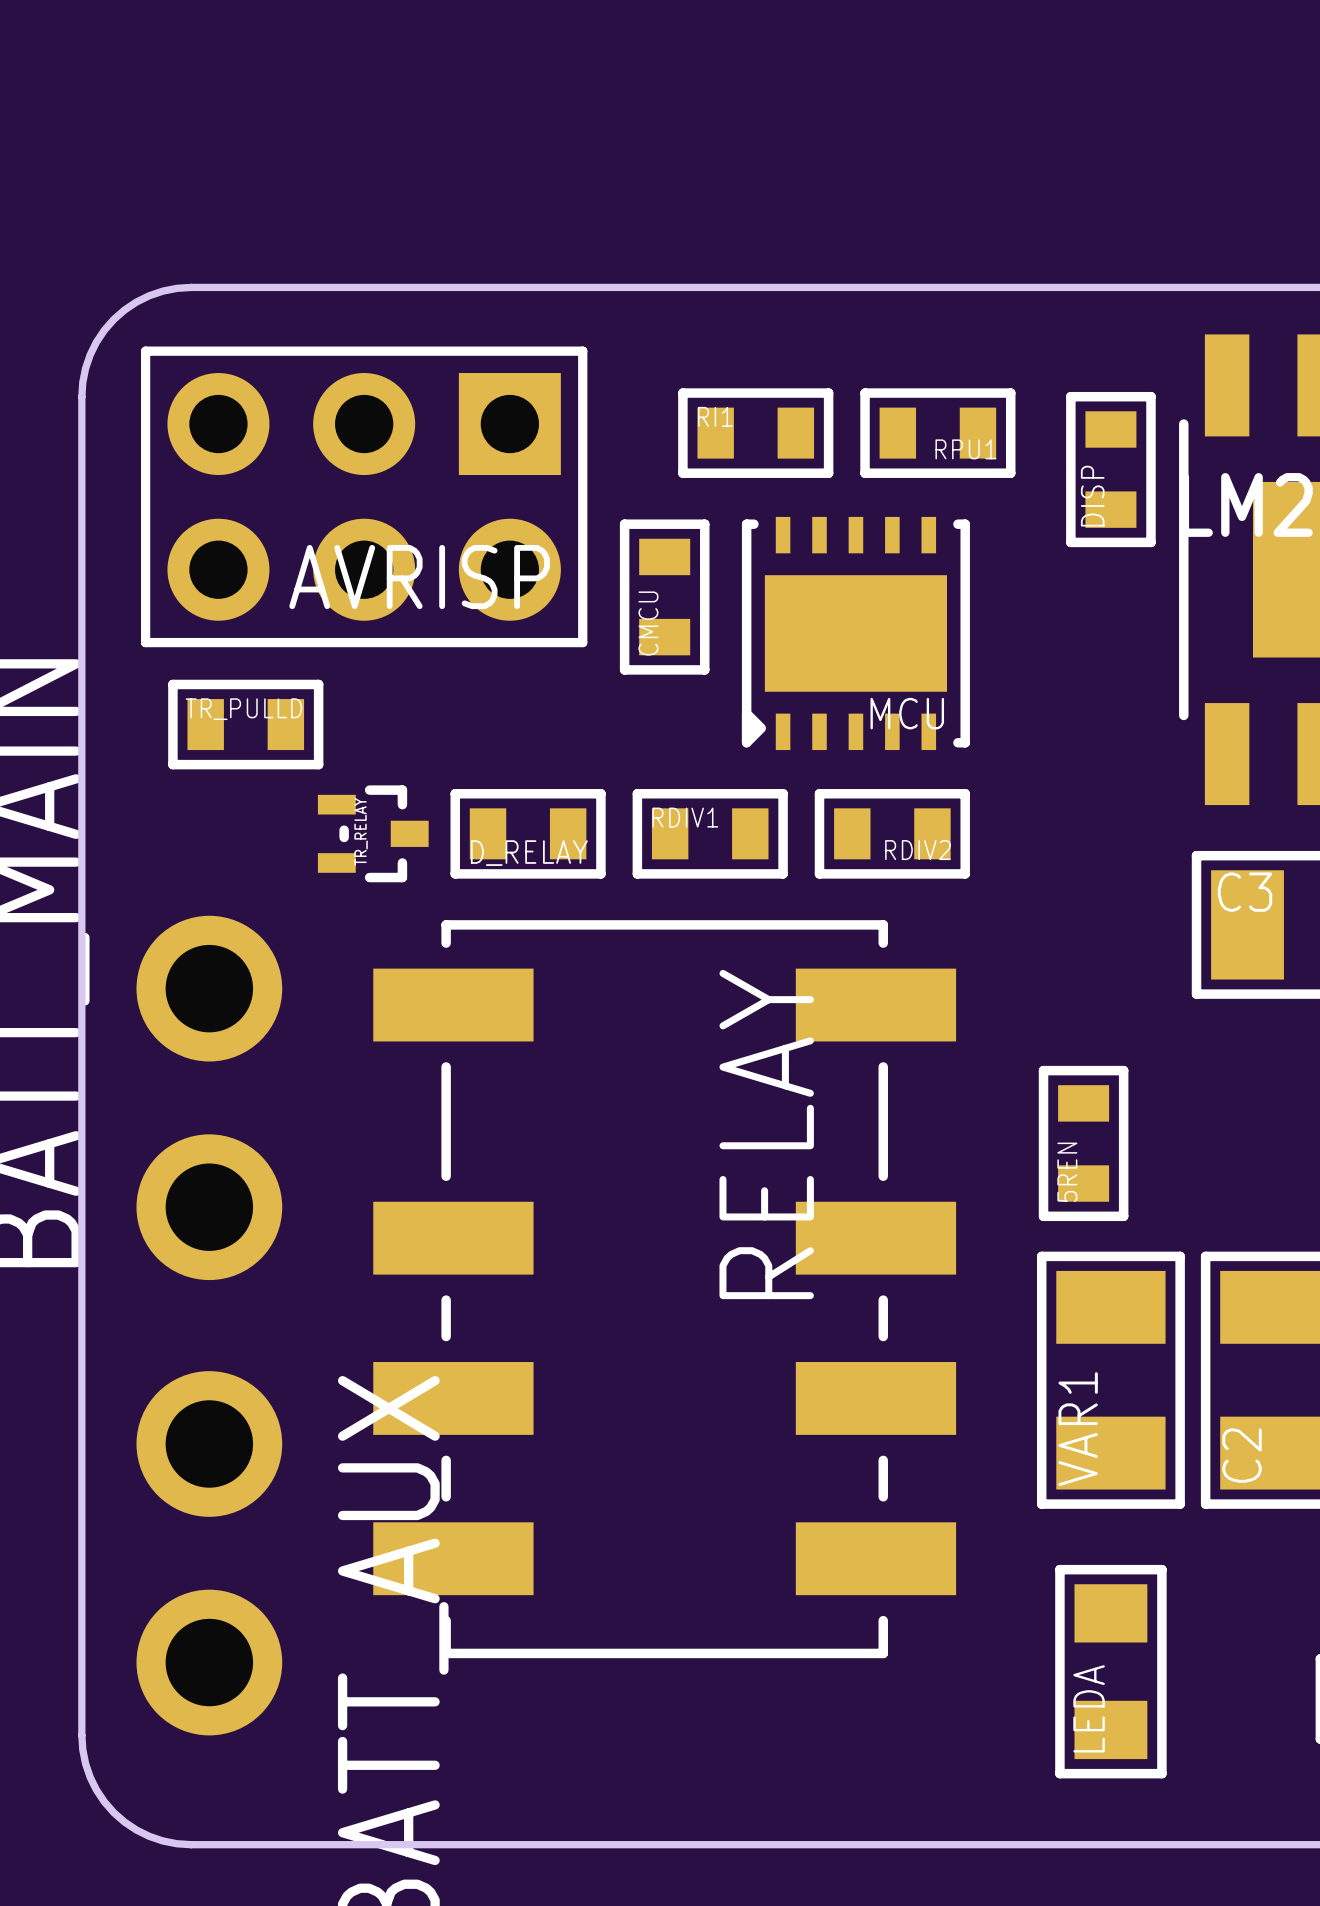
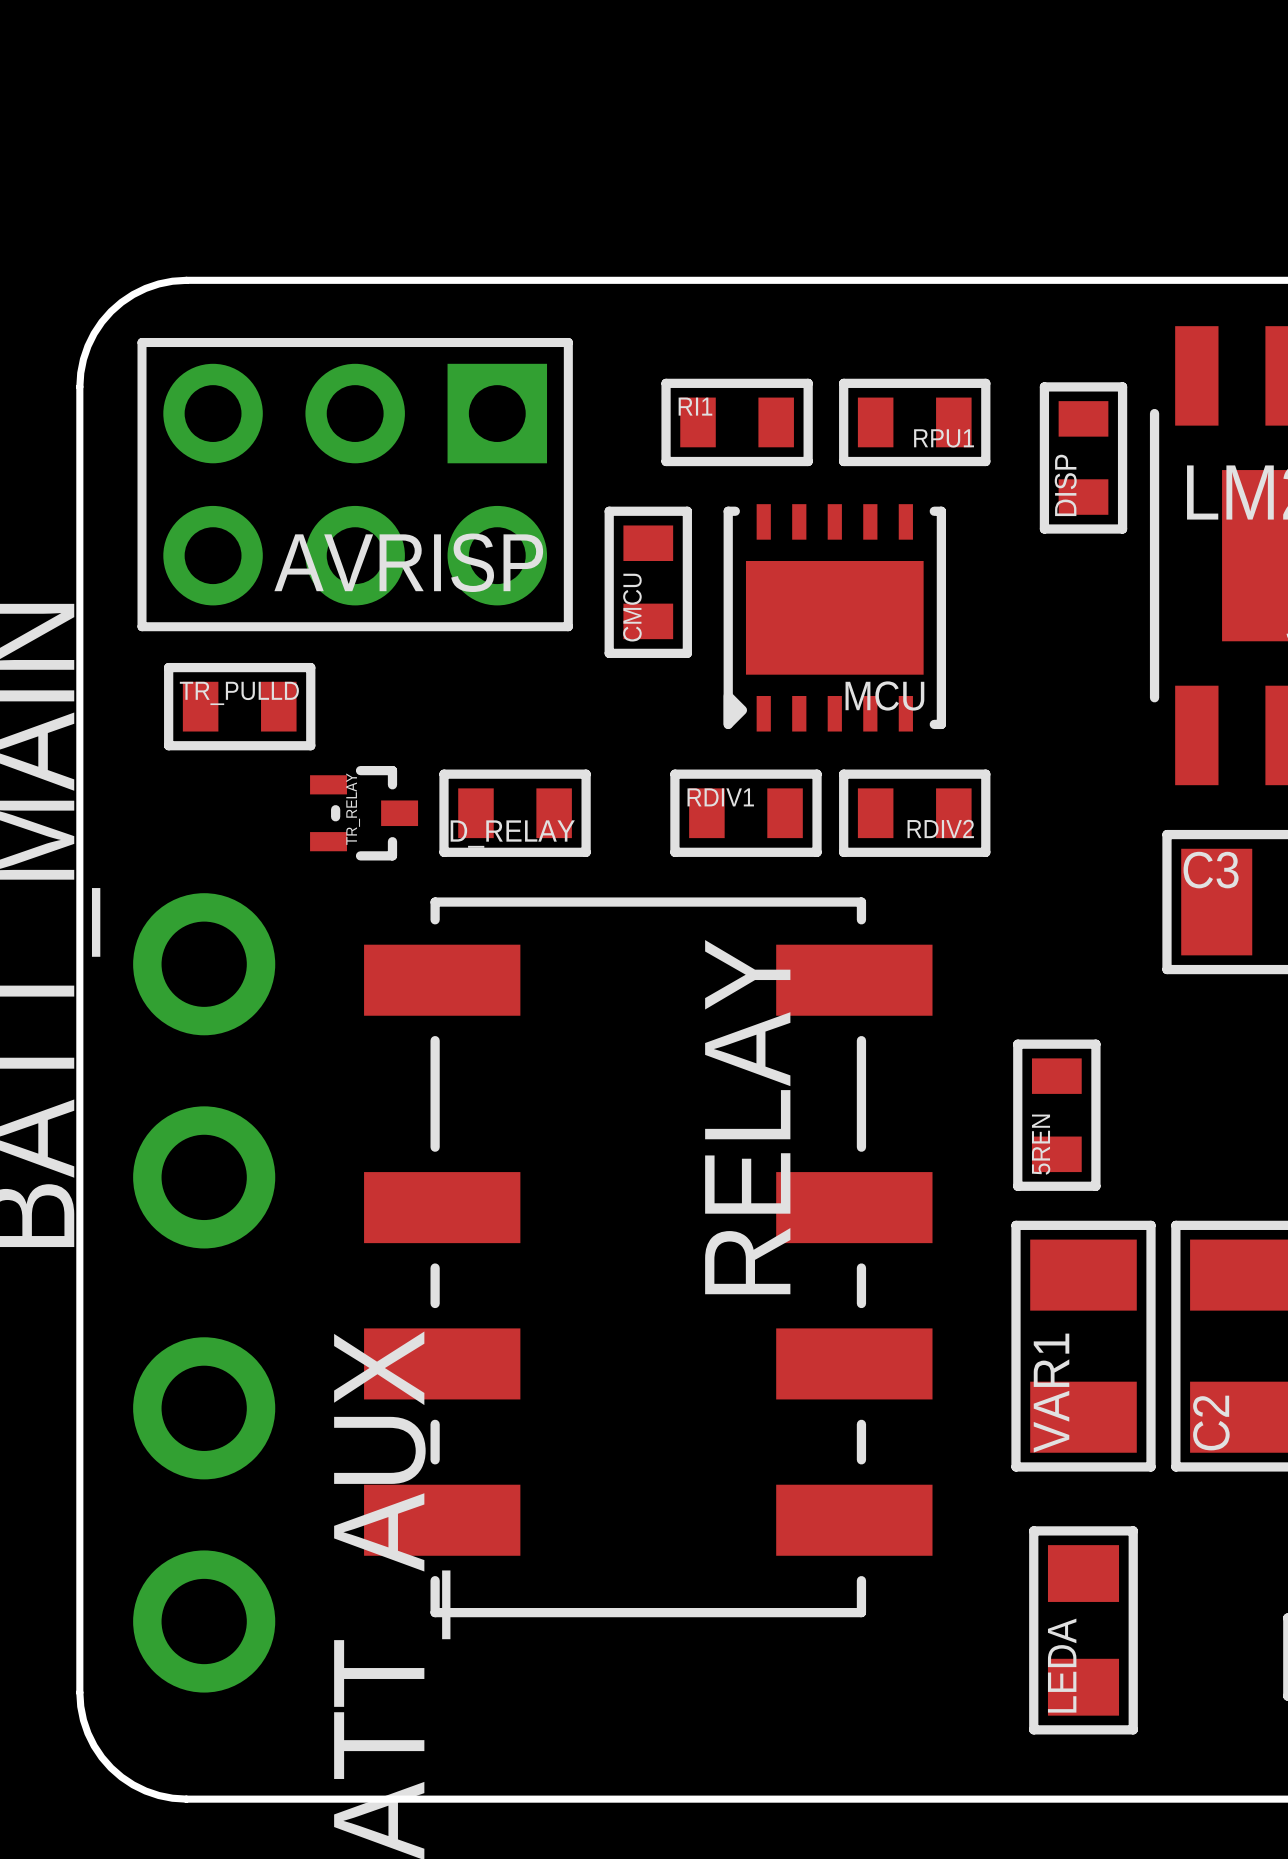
RDIV1 position: (710, 833) -> (745, 813)
RDIV2 position: (892, 833) -> (914, 813)

